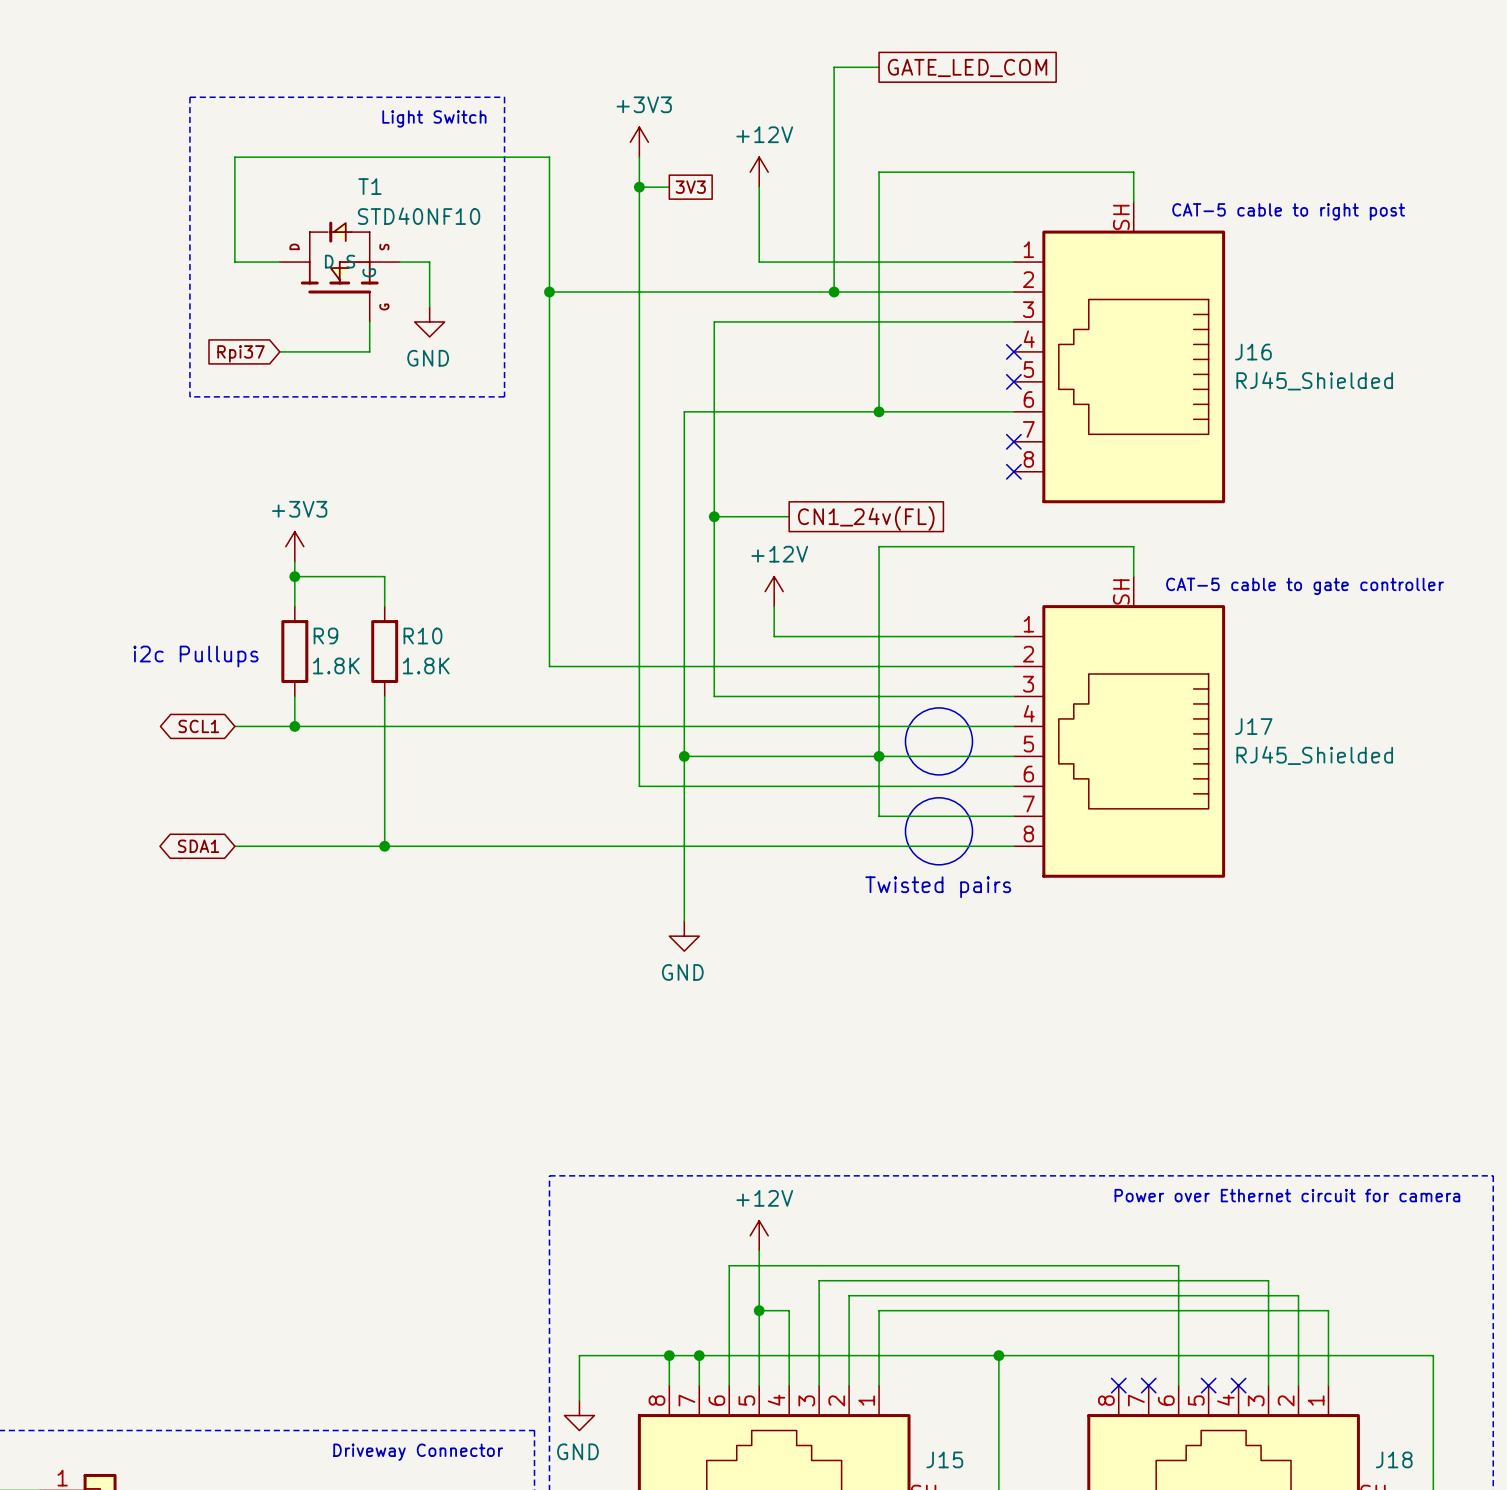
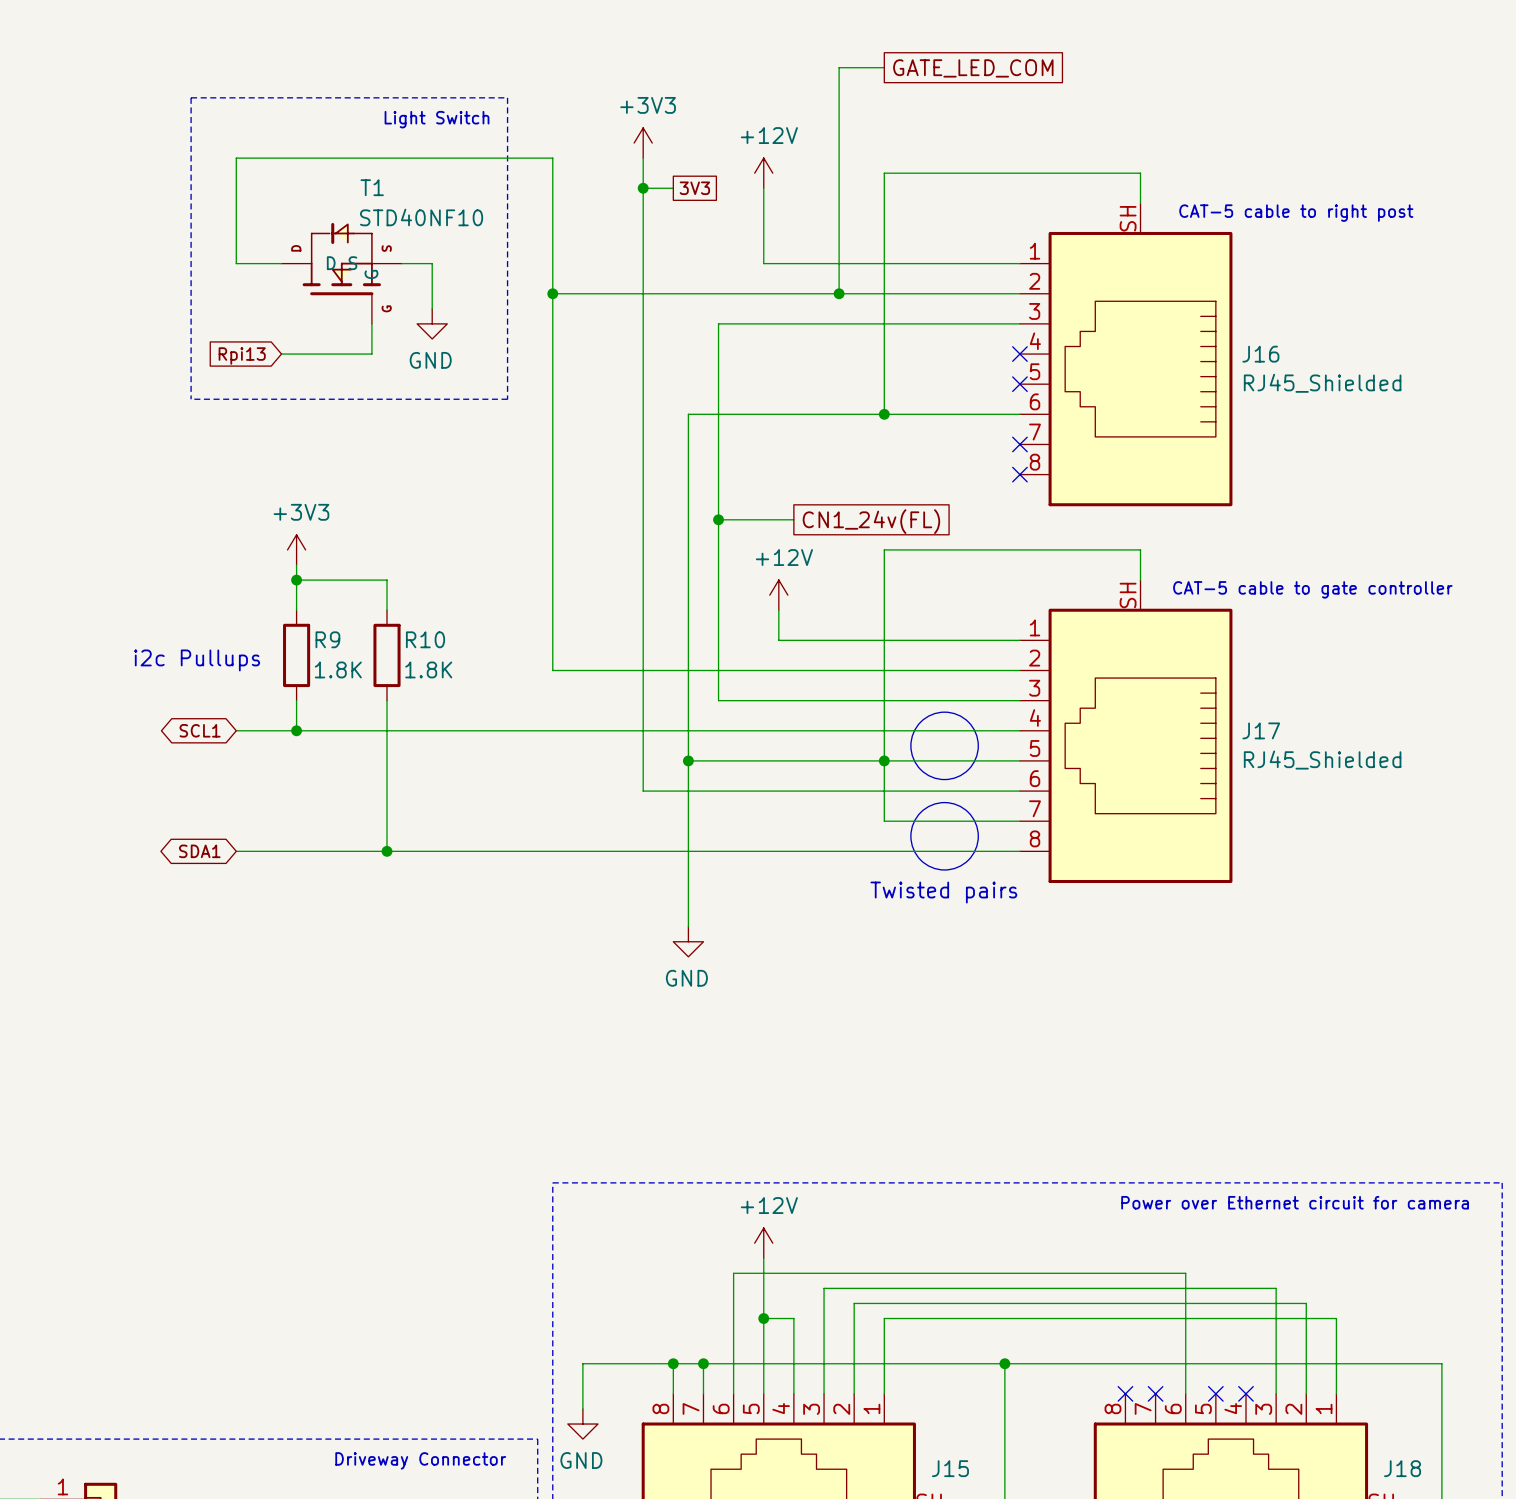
global label: Rpi37 (241, 353) -> Rpi13 (242, 355)

